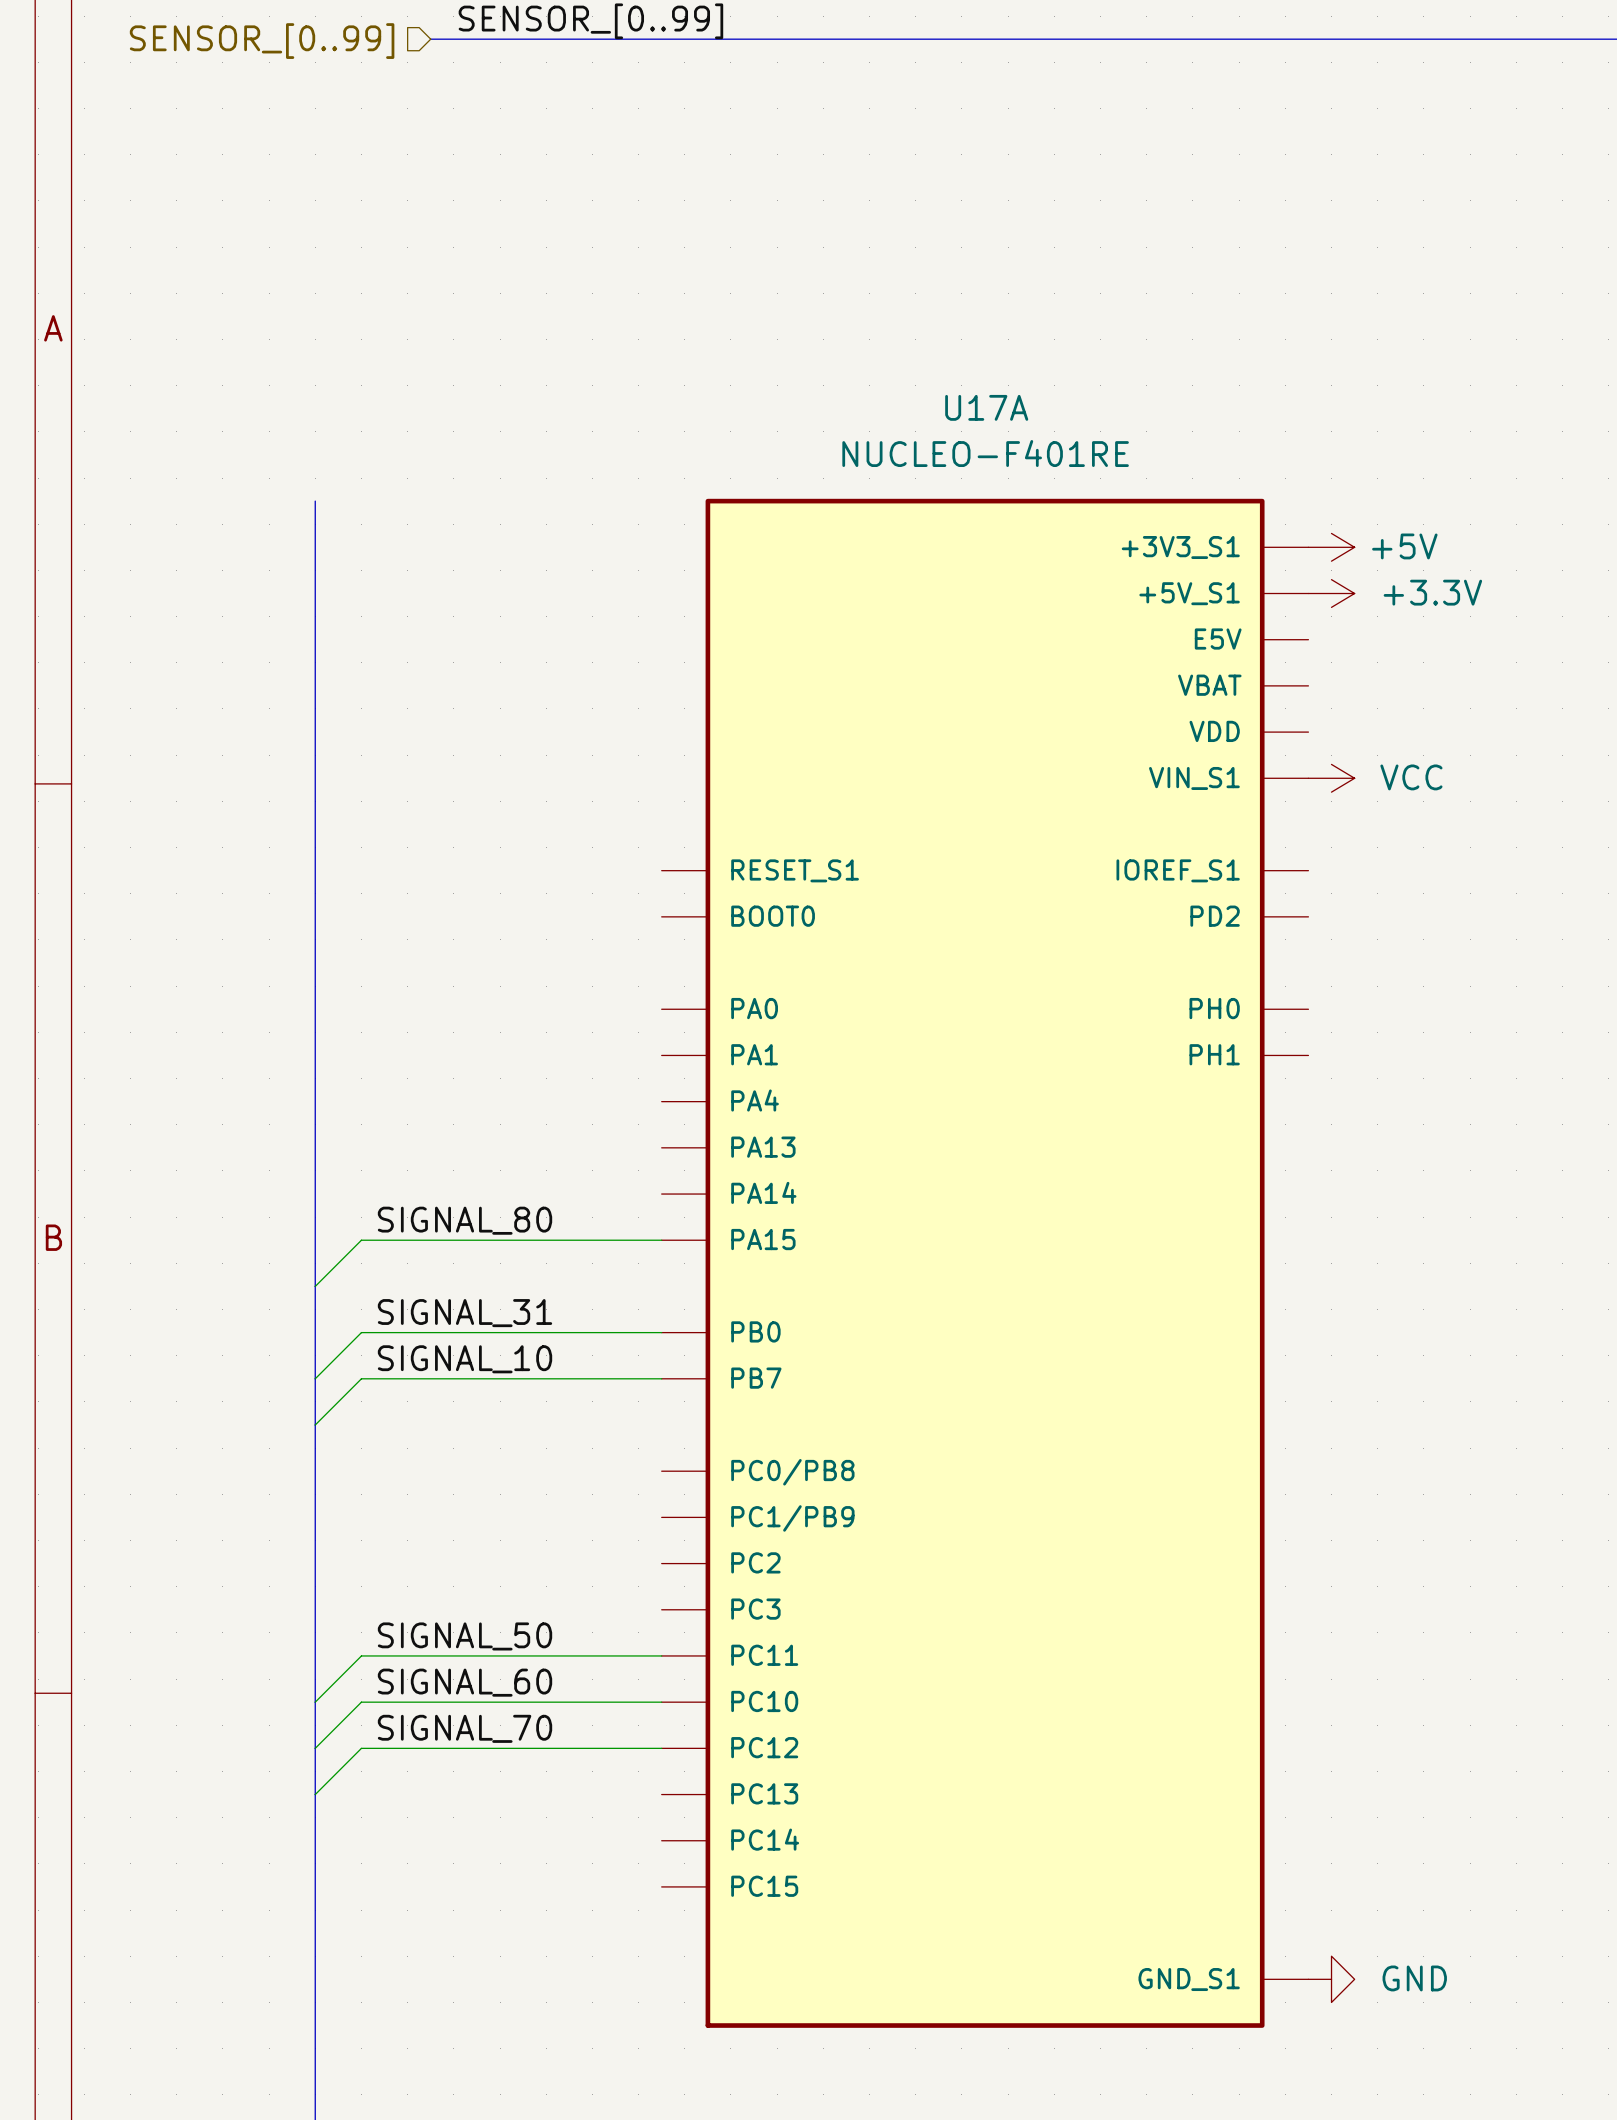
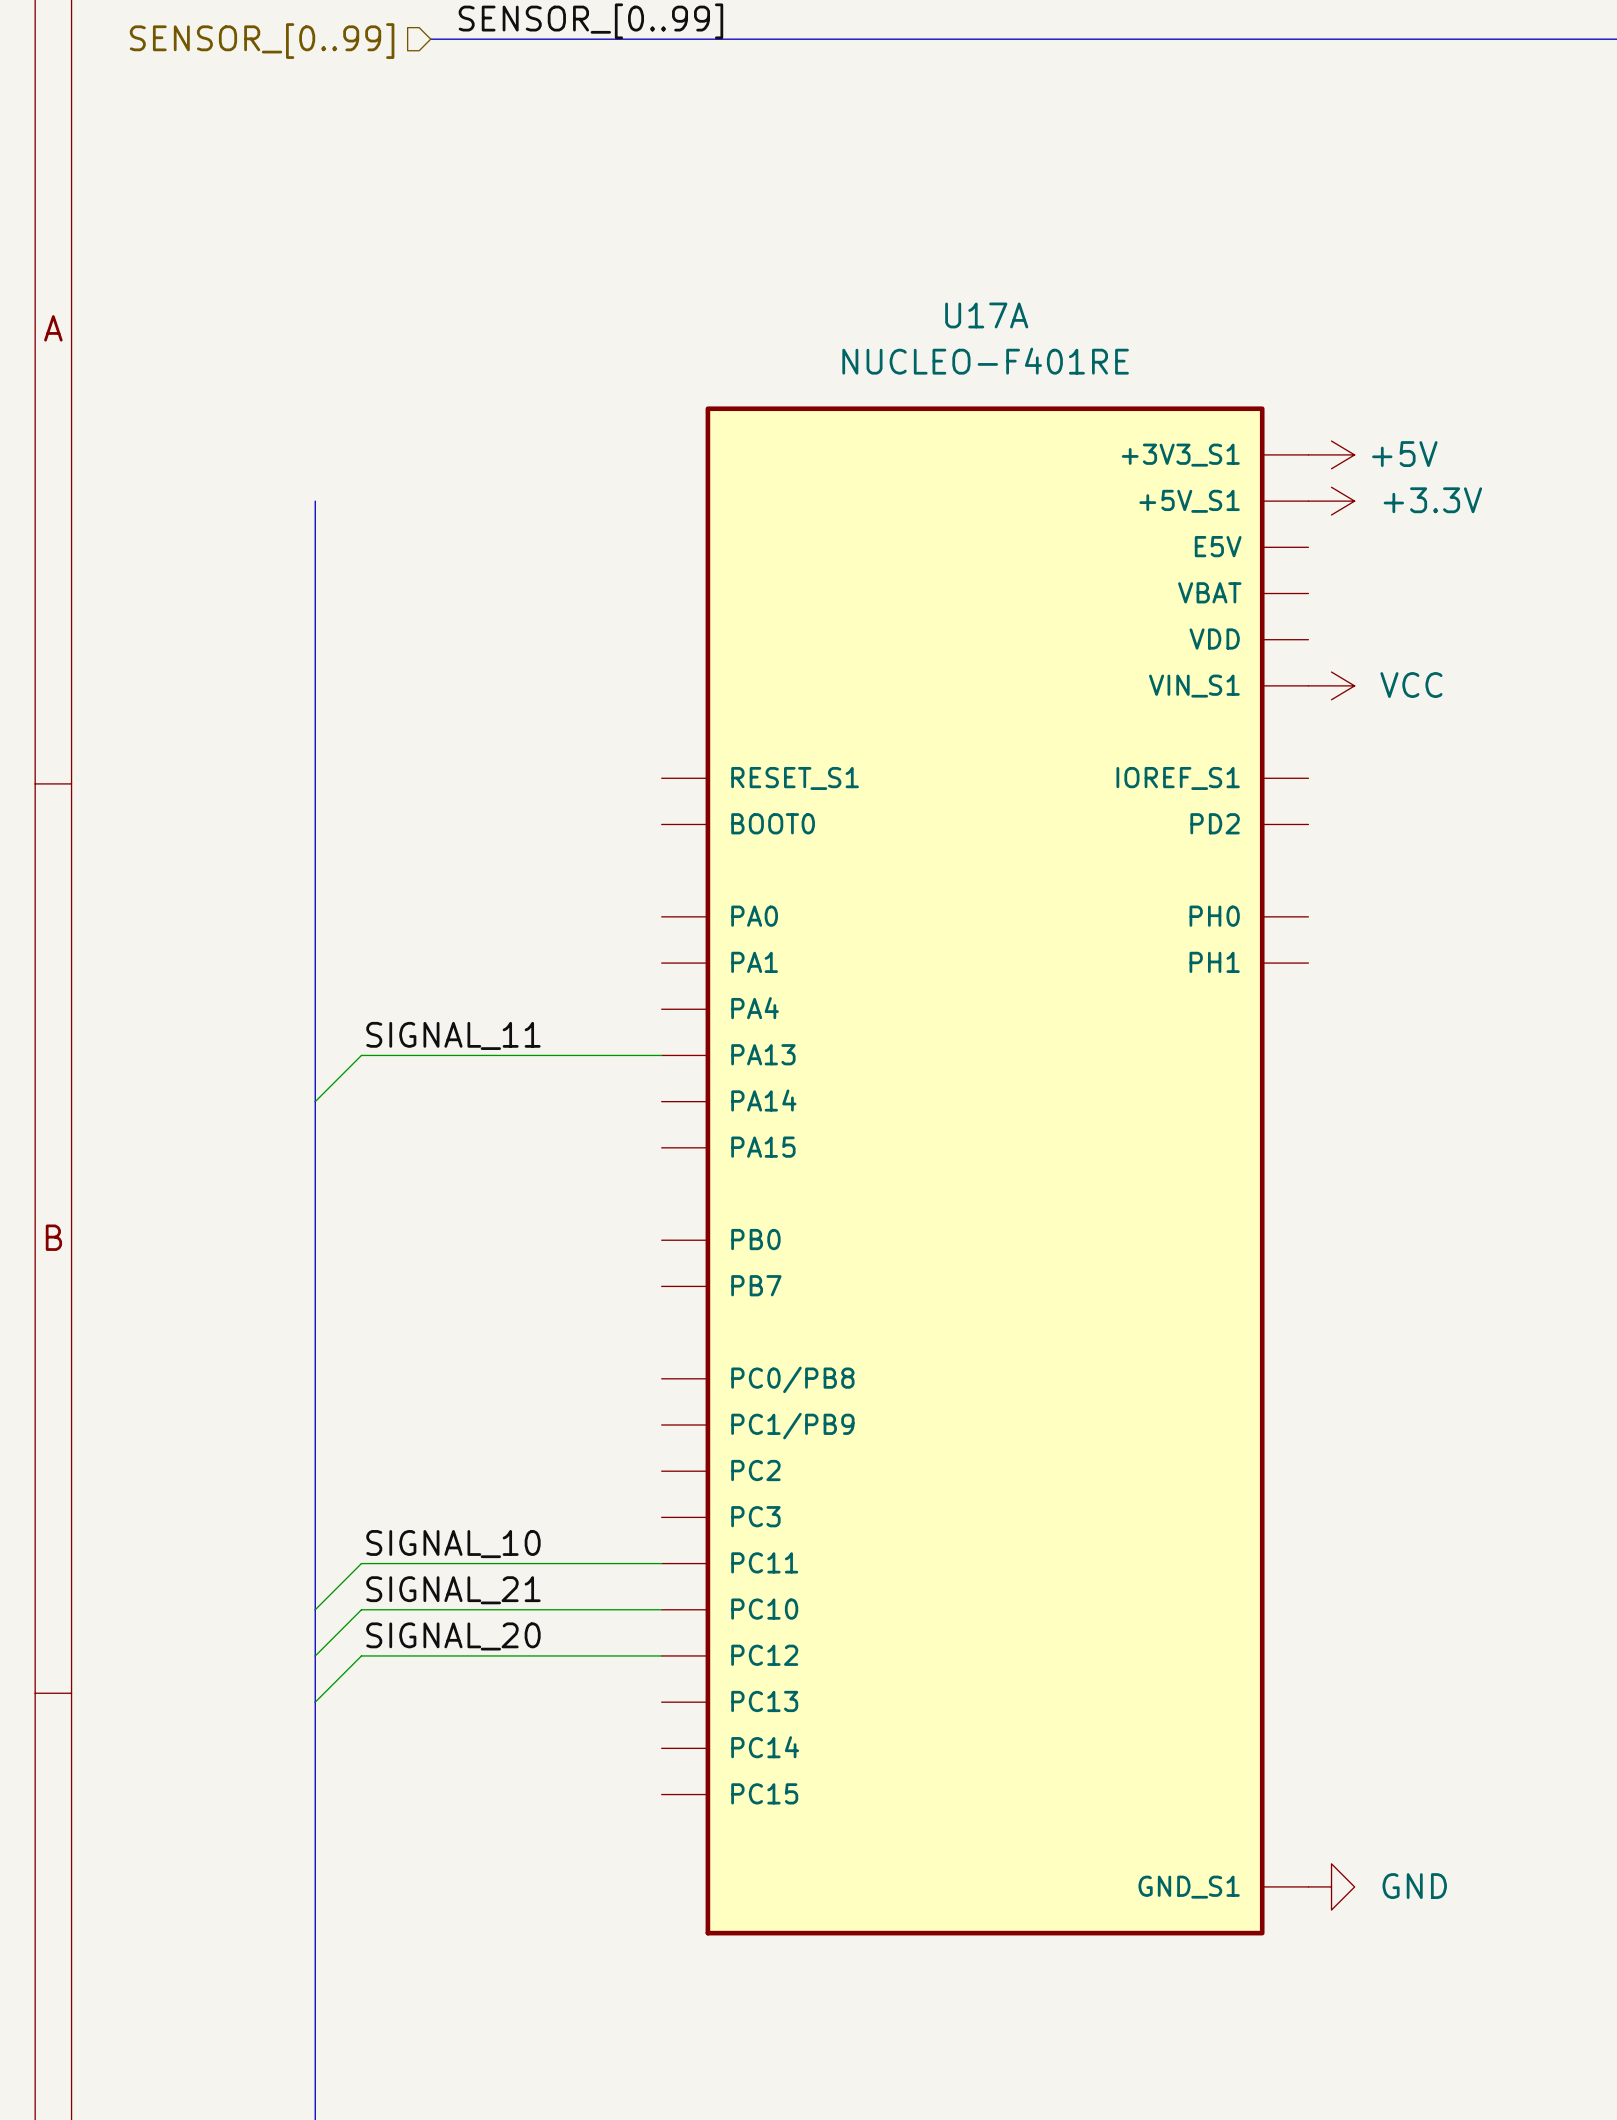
power symbol position: +5V (1331, 547) -> +5V (1331, 454)
power symbol position: +3.3V (1331, 593) -> +3.3V (1331, 501)
power symbol position: VCC (1331, 778) -> VCC (1331, 685)
label: none -> SIGNAL_11 (453, 1035)
label: SIGNAL_80 (465, 1220) -> none
wire: (661, 1240) (361, 1240) (315, 1286) -> (661, 1055) (361, 1055) (315, 1101)
U17A position: (985, 1263) -> (985, 1170)
label: SIGNAL_31 (465, 1313) -> none
wire: (661, 1332) (361, 1332) (315, 1378) -> none
label position: SIGNAL_10 (465, 1359) -> SIGNAL_10 (453, 1544)
wire: (661, 1378) (361, 1378) (315, 1425) -> none
label: none -> SIGNAL_21 (453, 1590)
label: SIGNAL_50 (465, 1636) -> SIGNAL_20 (453, 1636)
label: SIGNAL_60 (465, 1682) -> none
wire: (661, 1702) (361, 1702) (315, 1748) -> (661, 1563) (361, 1563) (315, 1609)
label: SIGNAL_70 (465, 1728) -> none
wire: (661, 1748) (361, 1748) (315, 1794) -> (661, 1609) (361, 1609) (315, 1655)
power symbol position: GND (1331, 1979) -> GND (1331, 1886)

